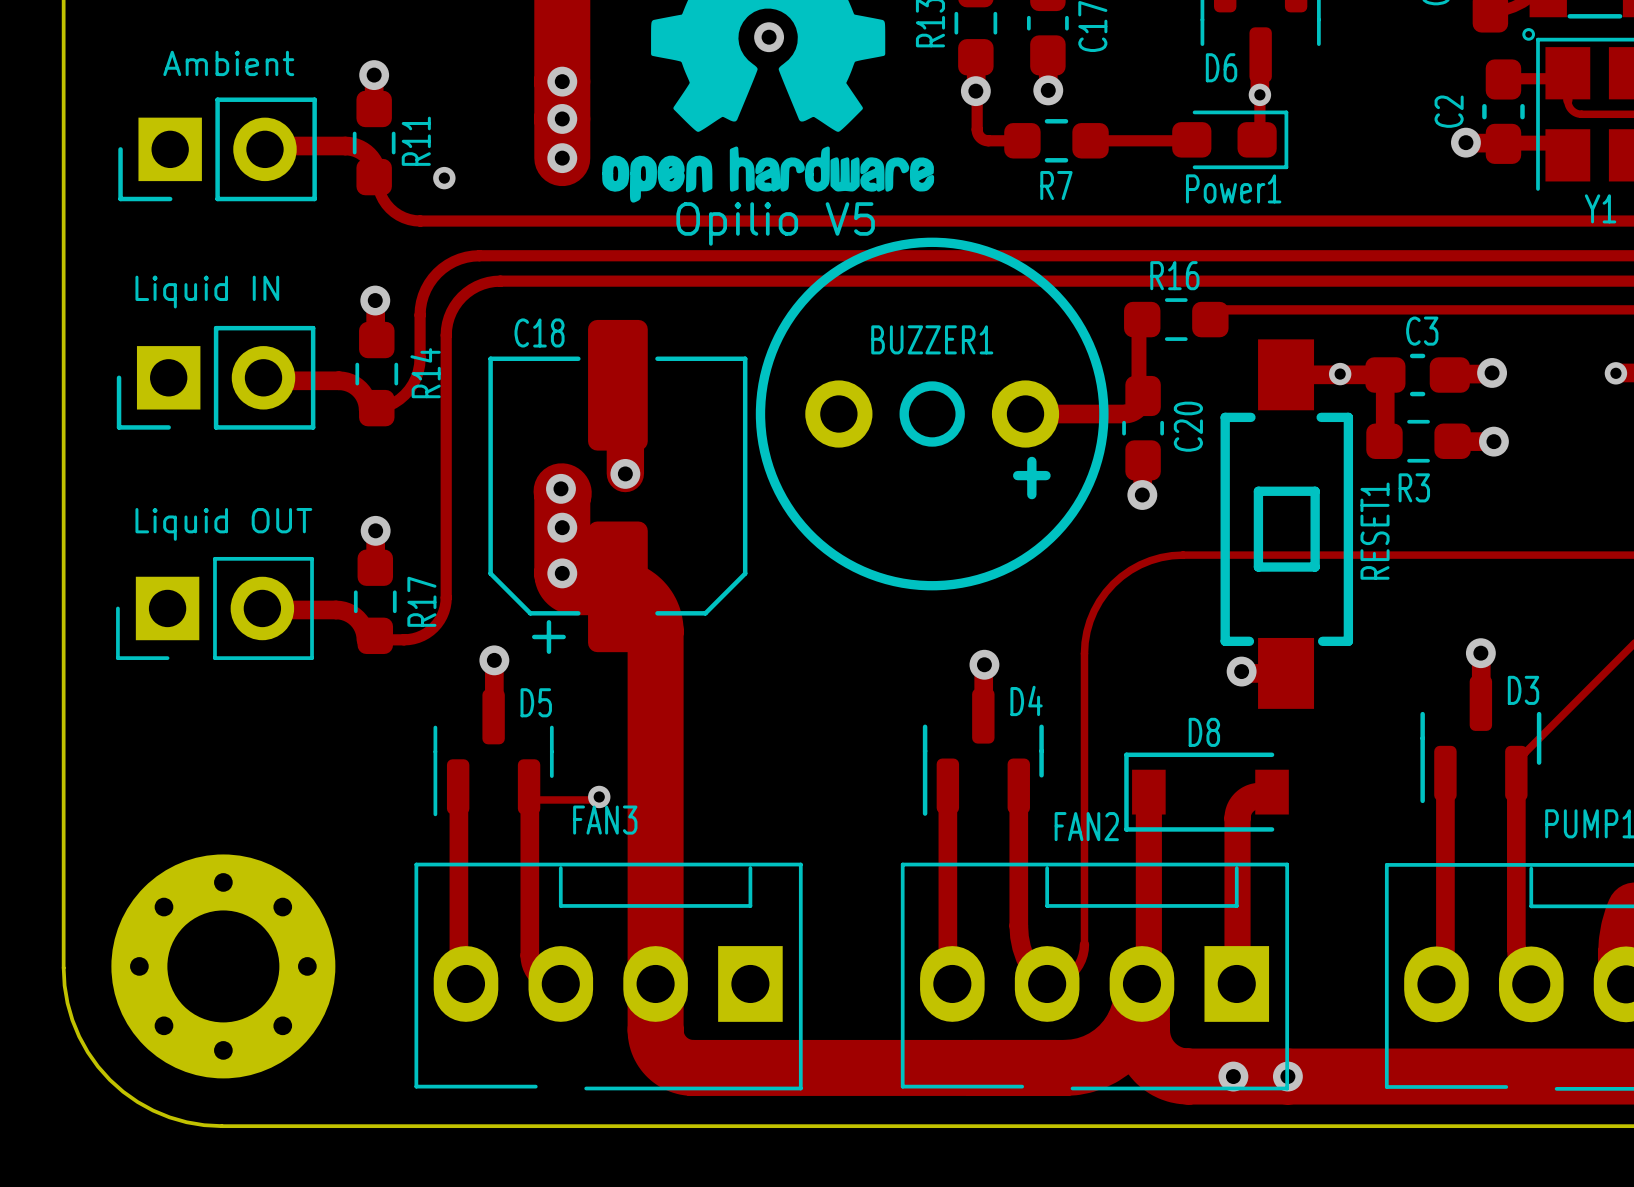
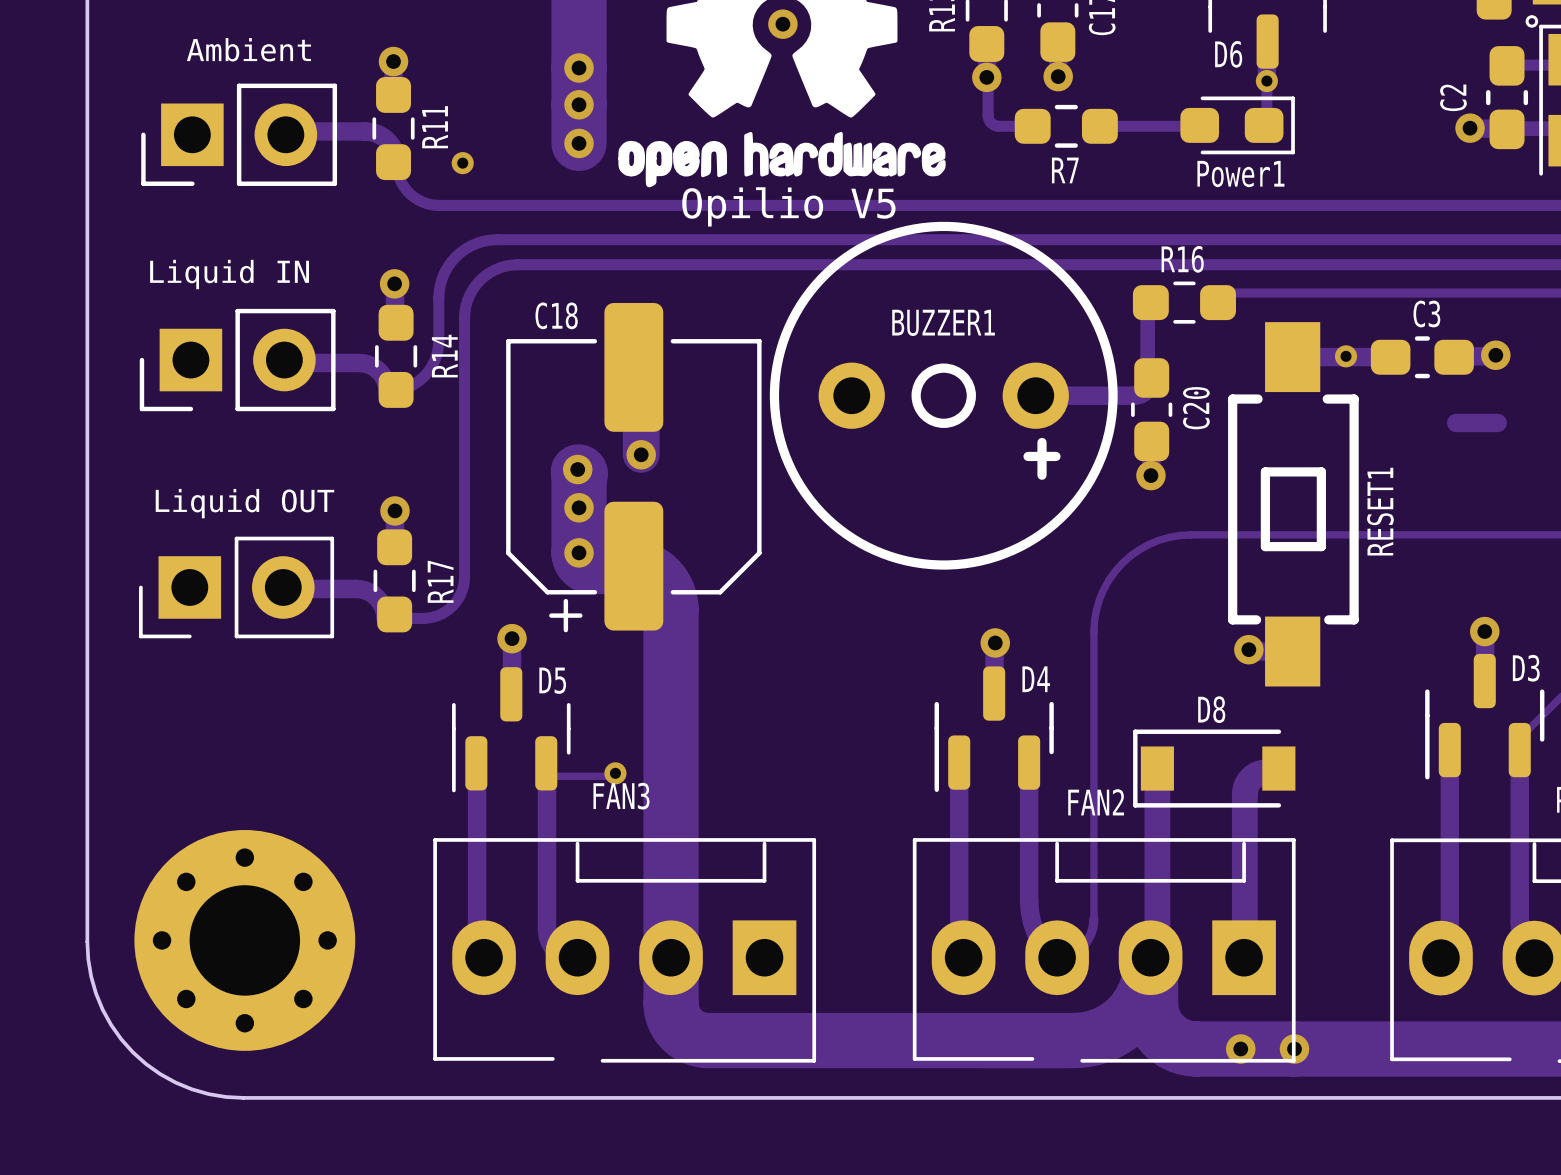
track: (1385, 374) (1385, 439) -> none
R3: (1418, 441) -> none
via: (1493, 441) -> none

